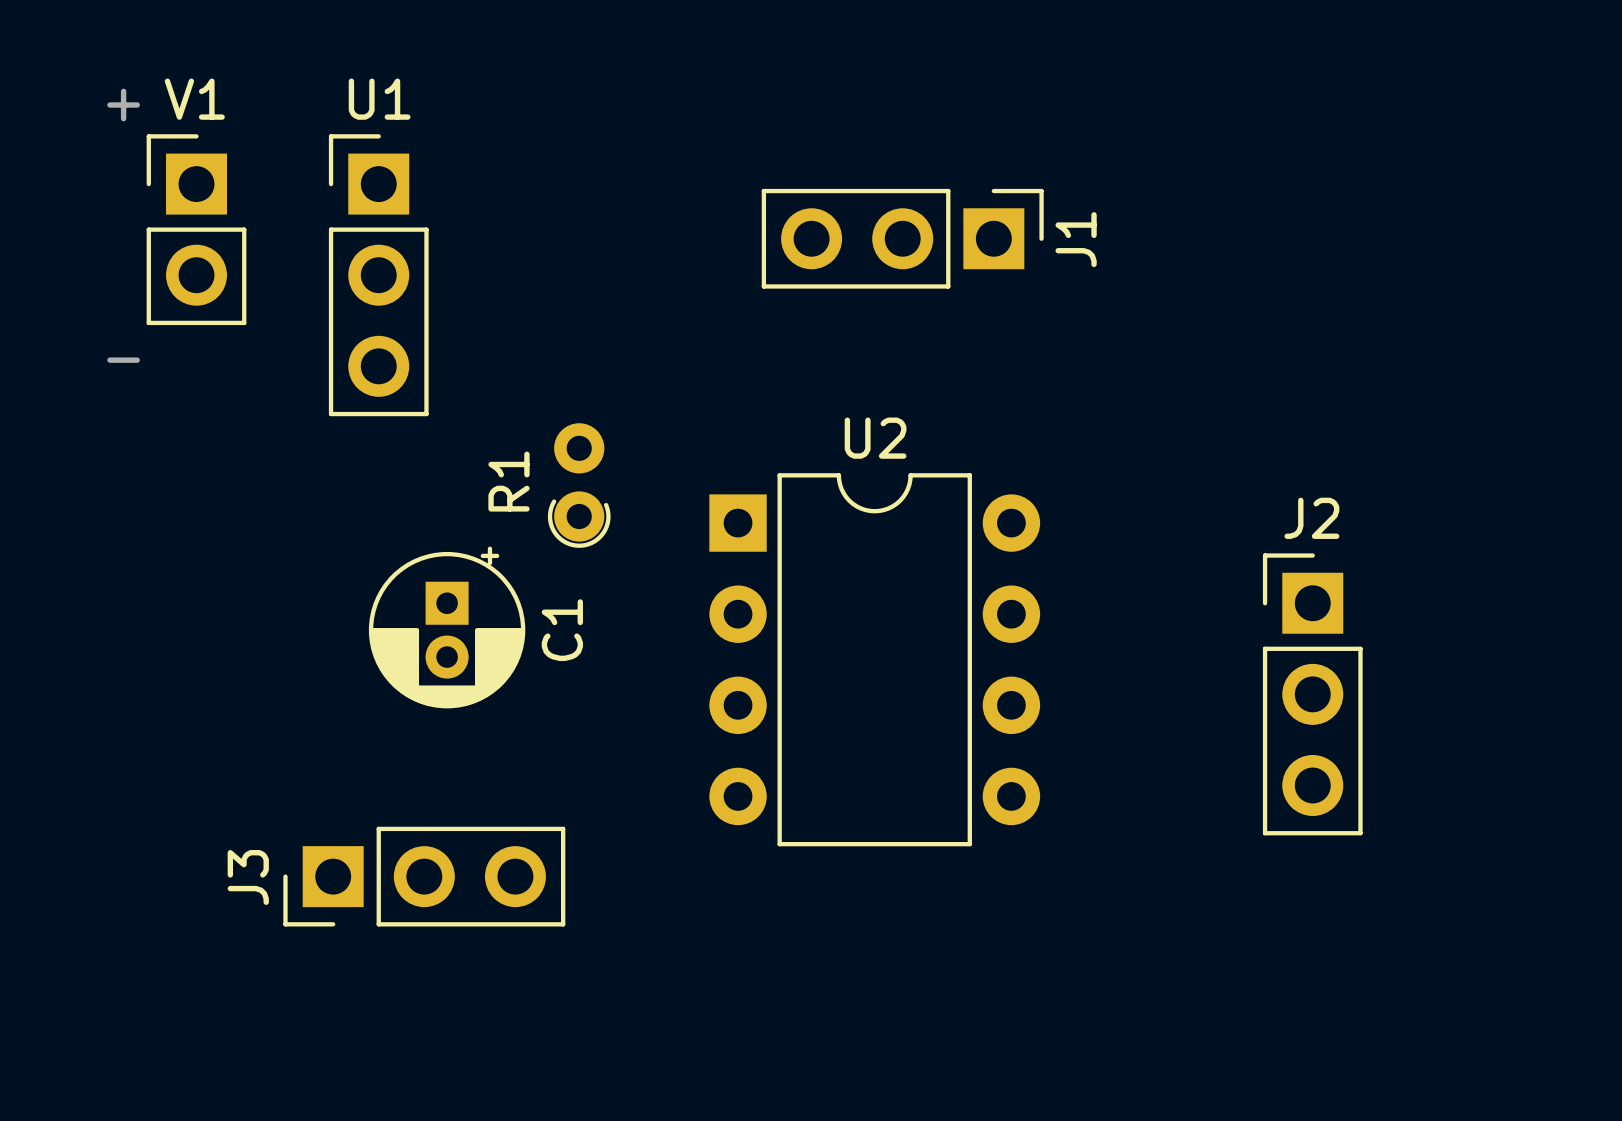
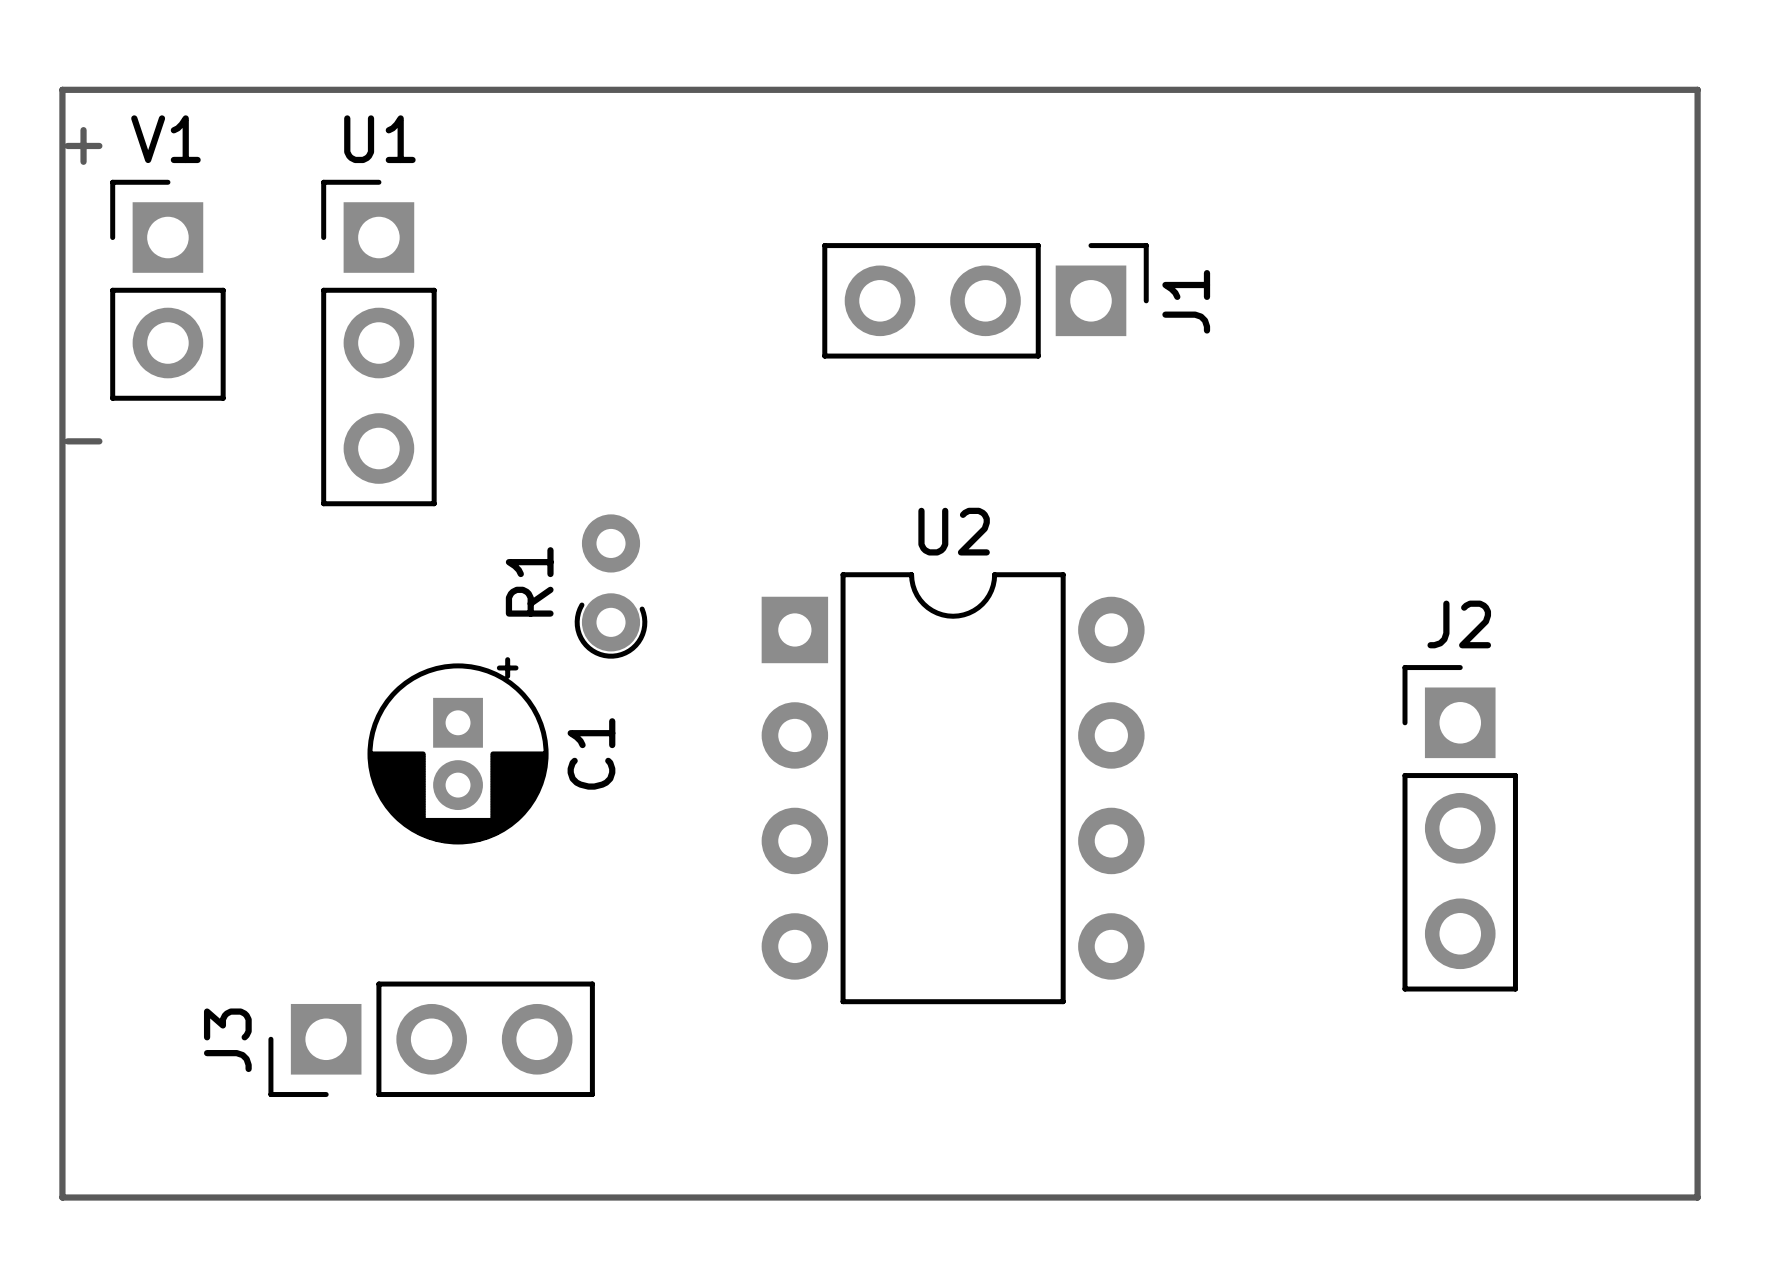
line: none -> (62, 89) (1697, 89) (1697, 1197) (62, 1197) (62, 89)

